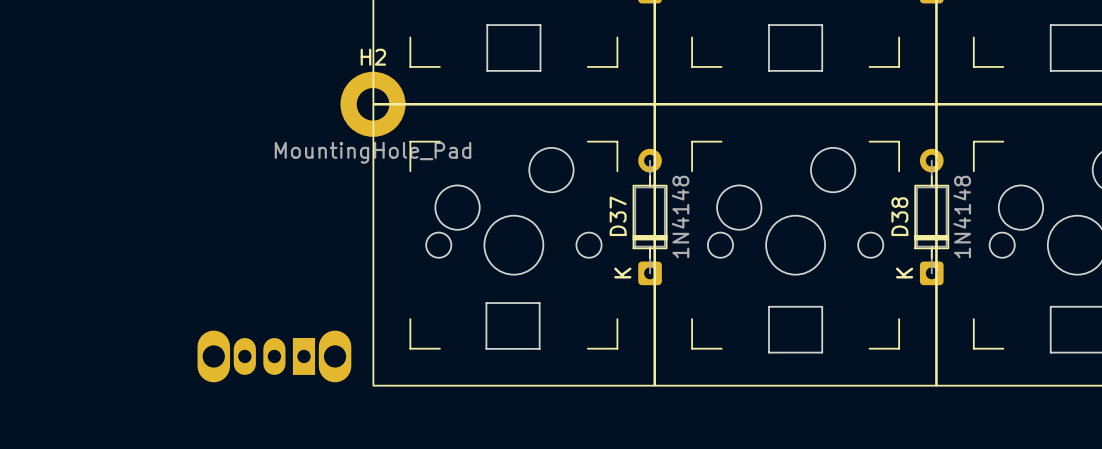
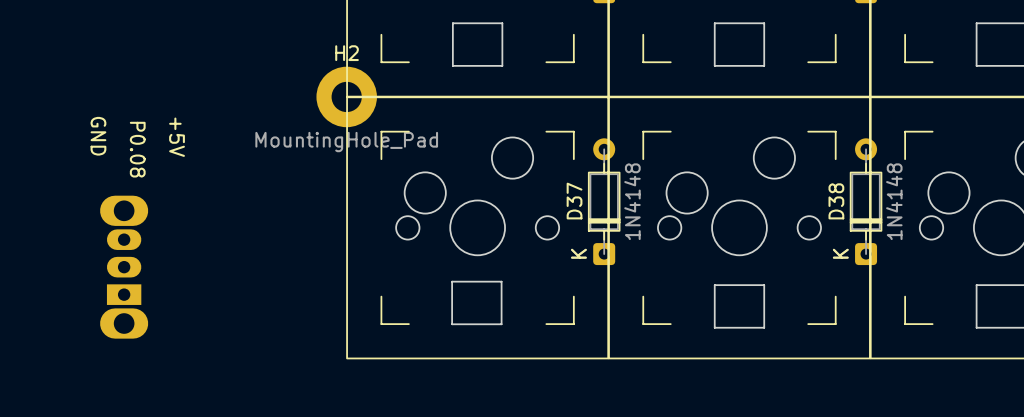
text: none -> GND (98, 136)
text: none -> +5V (177, 137)
text: none -> P0.08 (137, 149)
part rotation: 0° (274, 356) -> 90° clockwise (124, 267)
part position: (274, 356) -> (124, 267)

